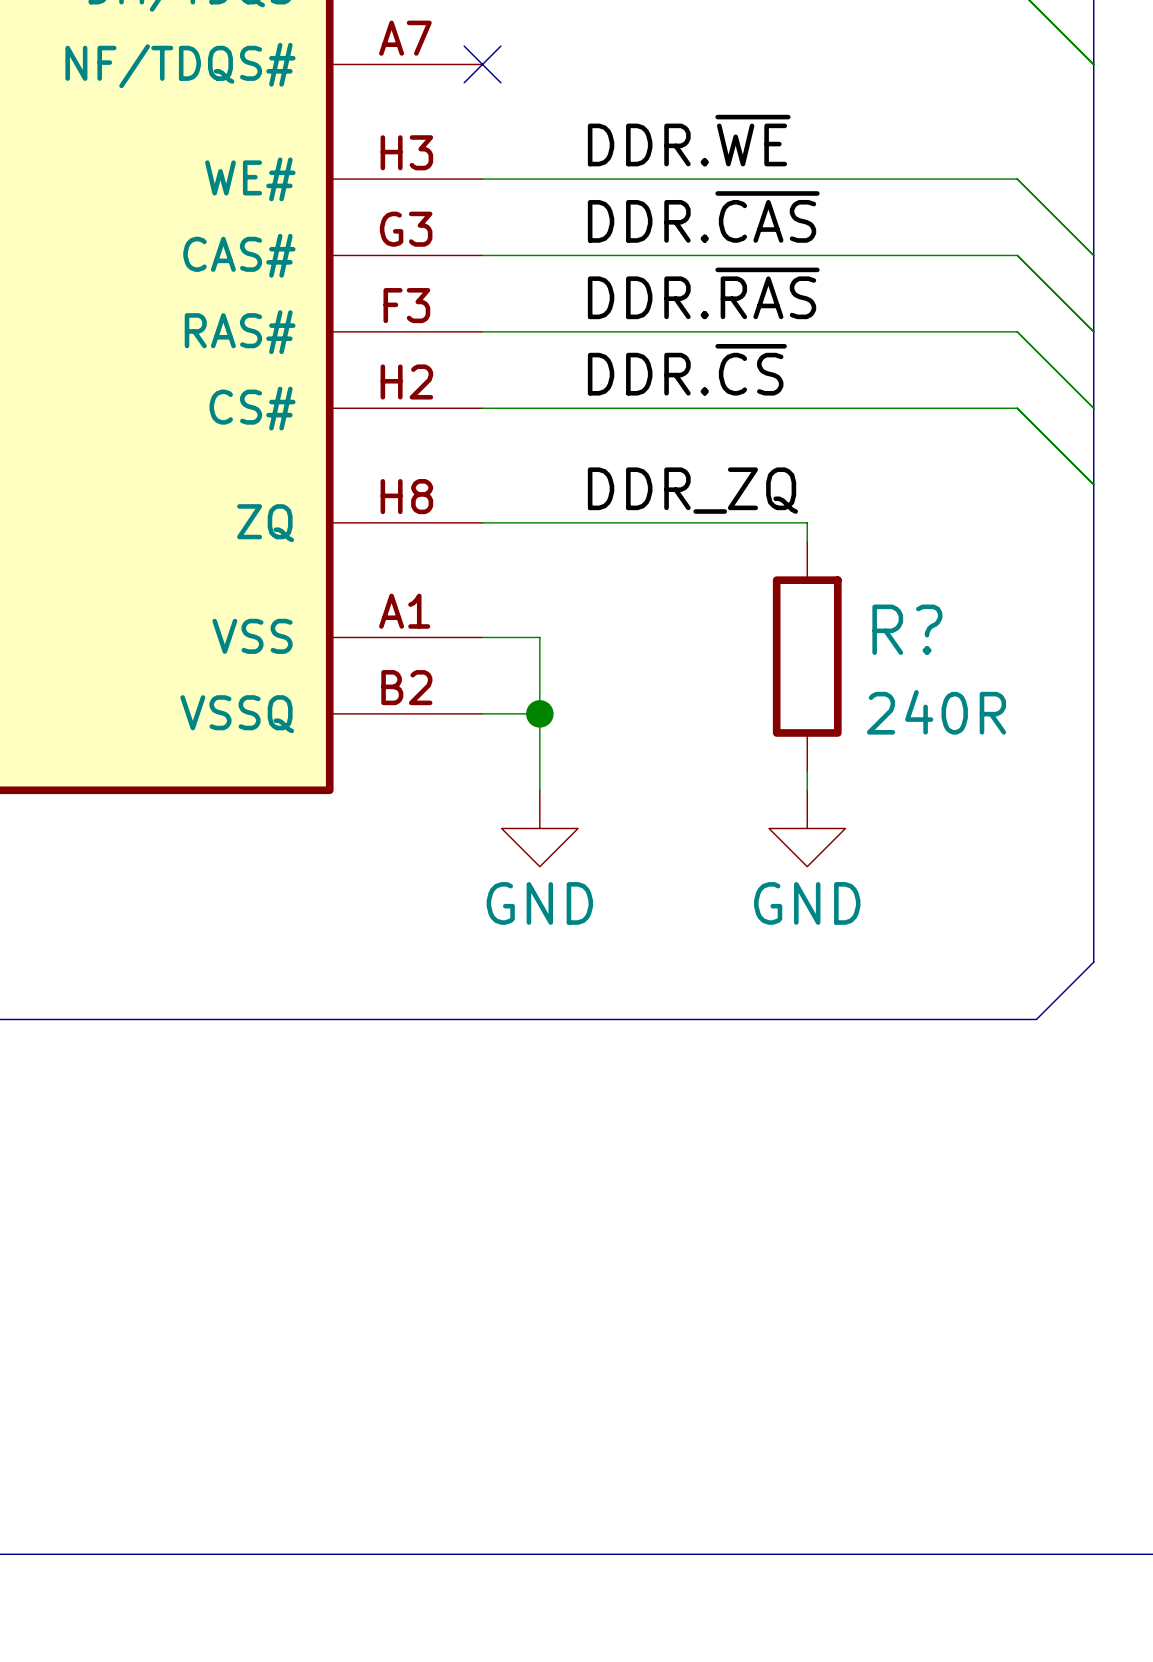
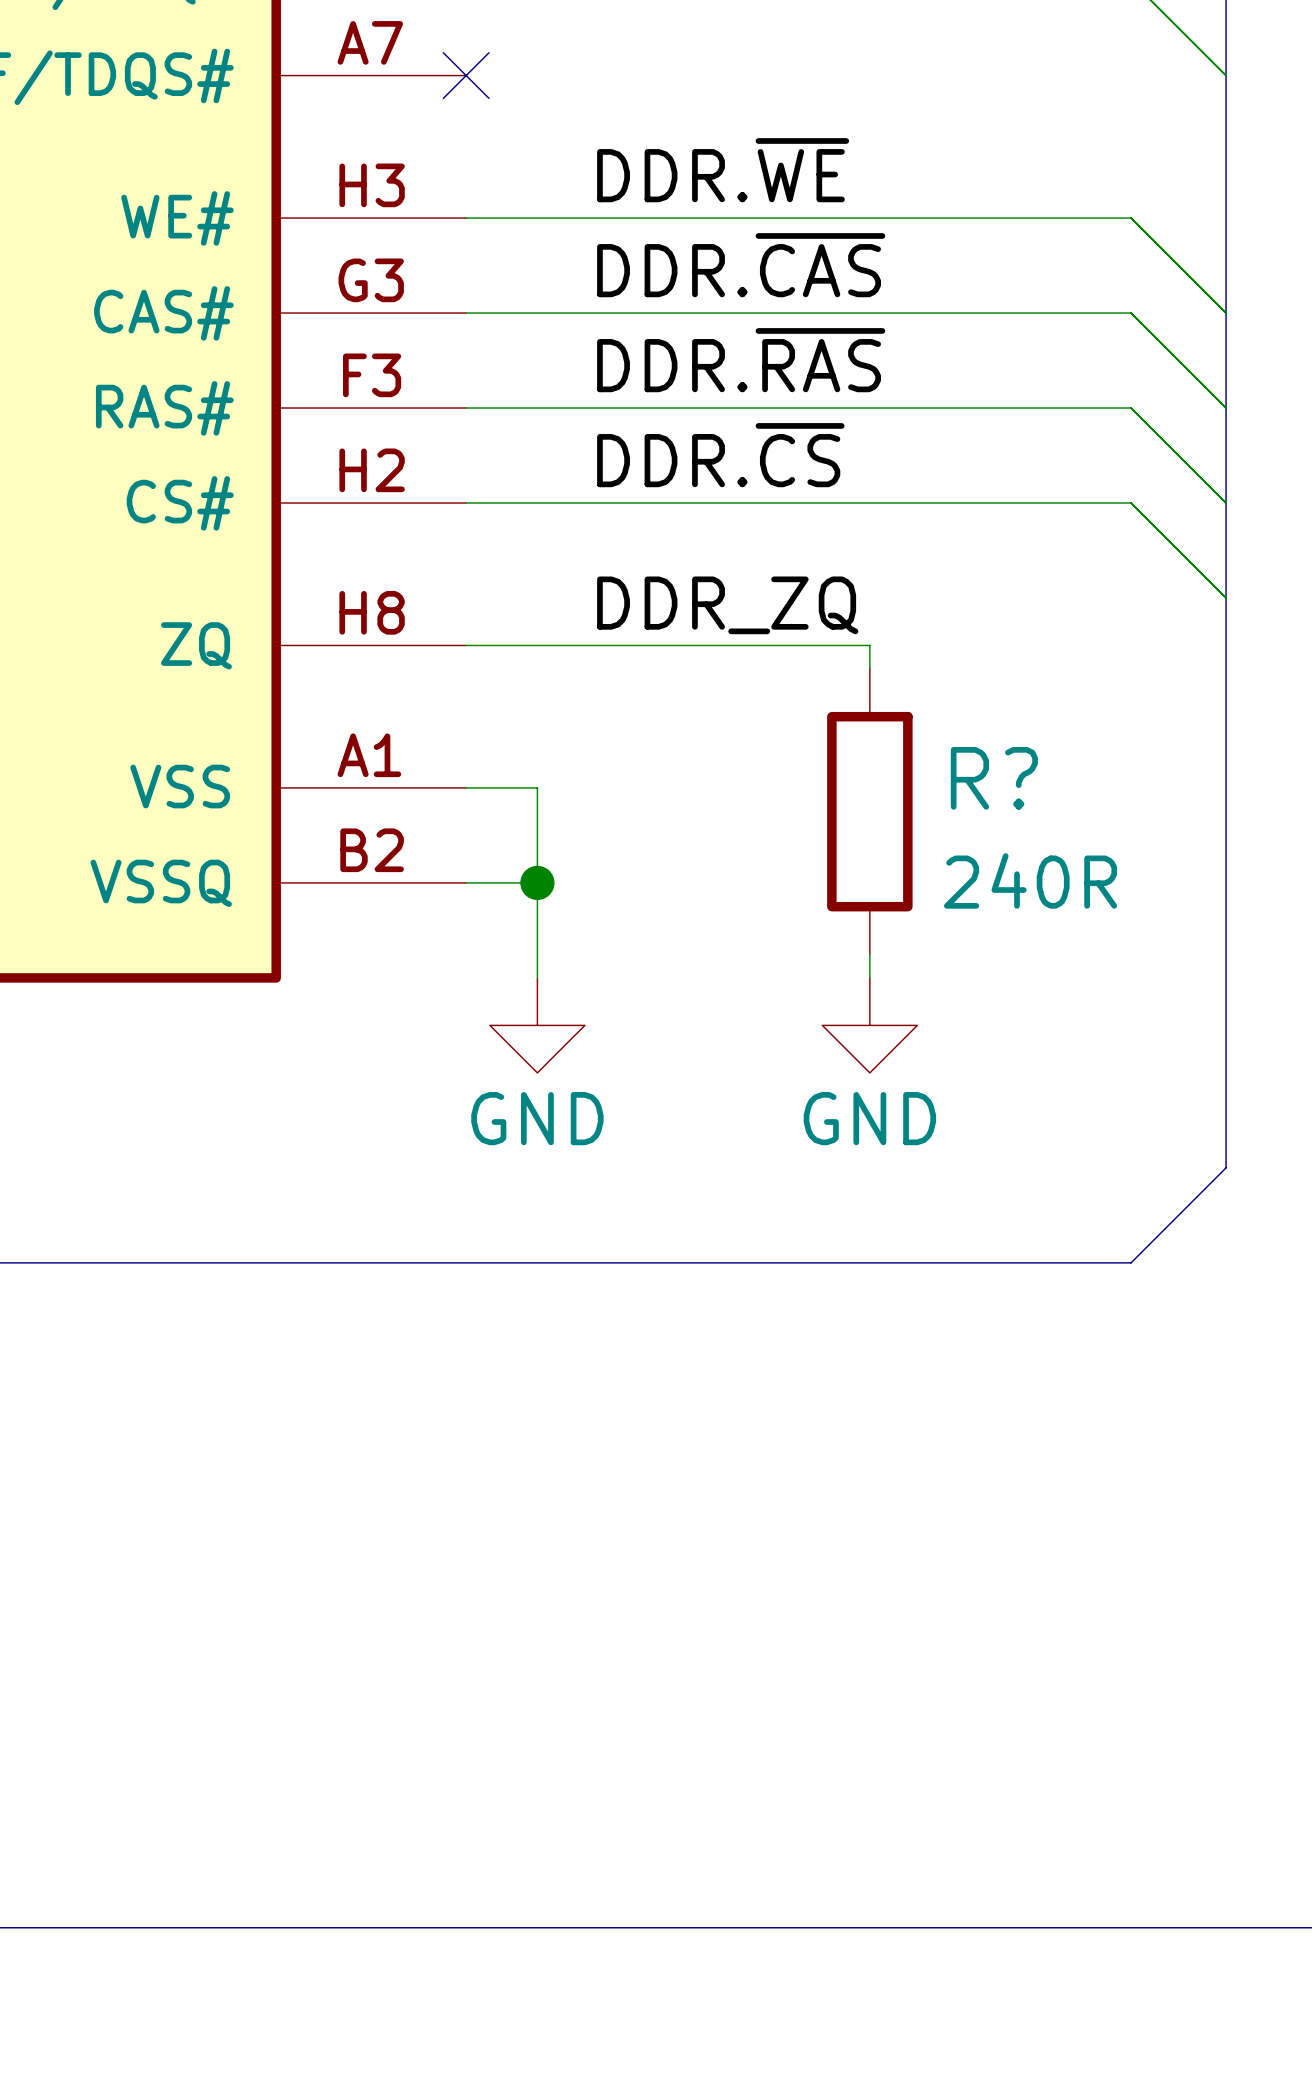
bus: (1093, 943) (1093, 962) (1036, 1019) (1017, 1019) -> (1226, 1167) (1131, 1262)

